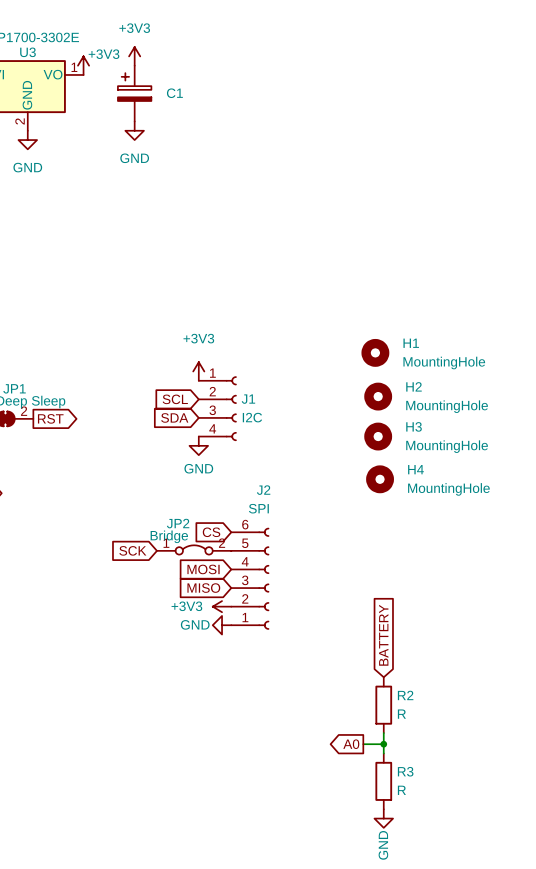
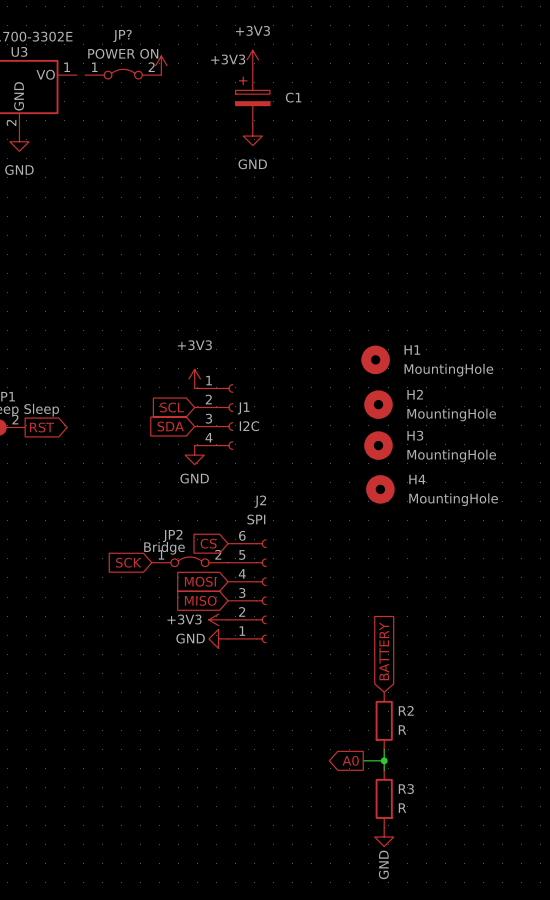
power symbol text position: +3V3 (134, 28) -> +3V3 (228, 59)
power symbol position: +3V3 (134, 56) -> +3V3 (161, 65)
power symbol: none -> +3V3 (252, 59)
power symbol: +3V3 (83, 65) -> none
JP?: none -> POWER ON (123, 74)
C1 position: (134, 93) -> (252, 97)
power symbol position: GND (134, 130) -> GND (252, 136)

